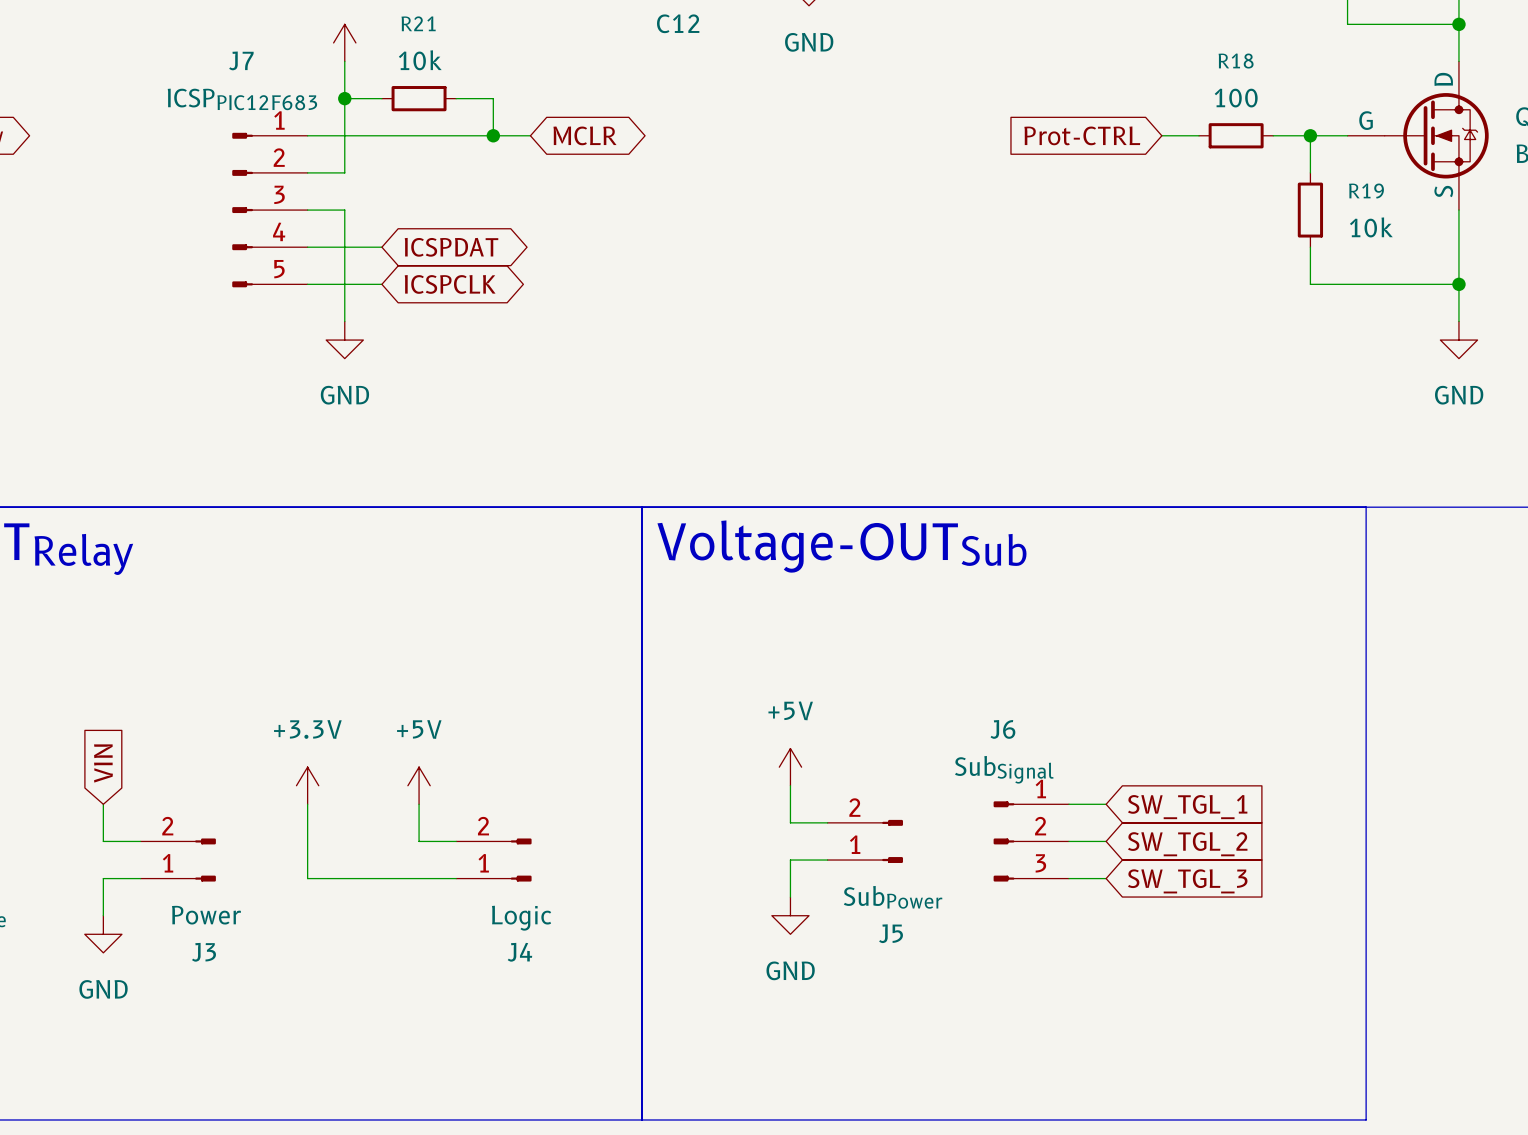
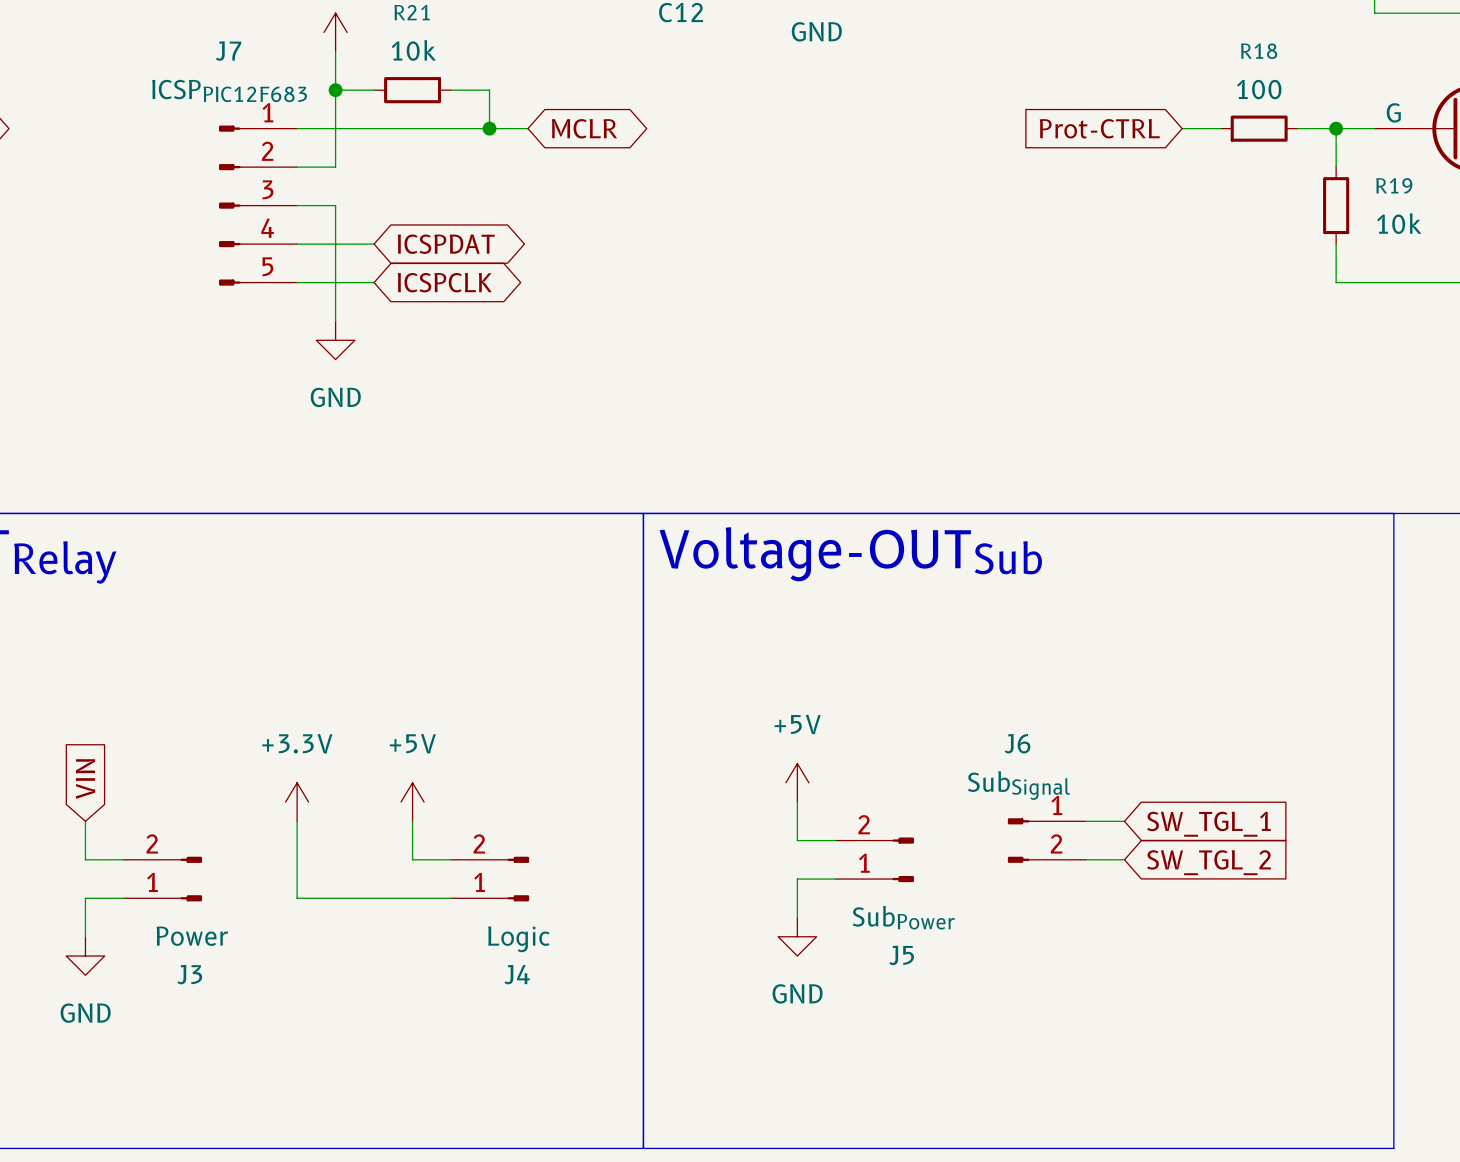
J6 symbol: [993, 801, 1070, 882] -> [1007, 818, 1087, 863]
wire: (1069, 878) (1106, 878) -> none
global label: SW_TGL_3 (1187, 881) -> none

